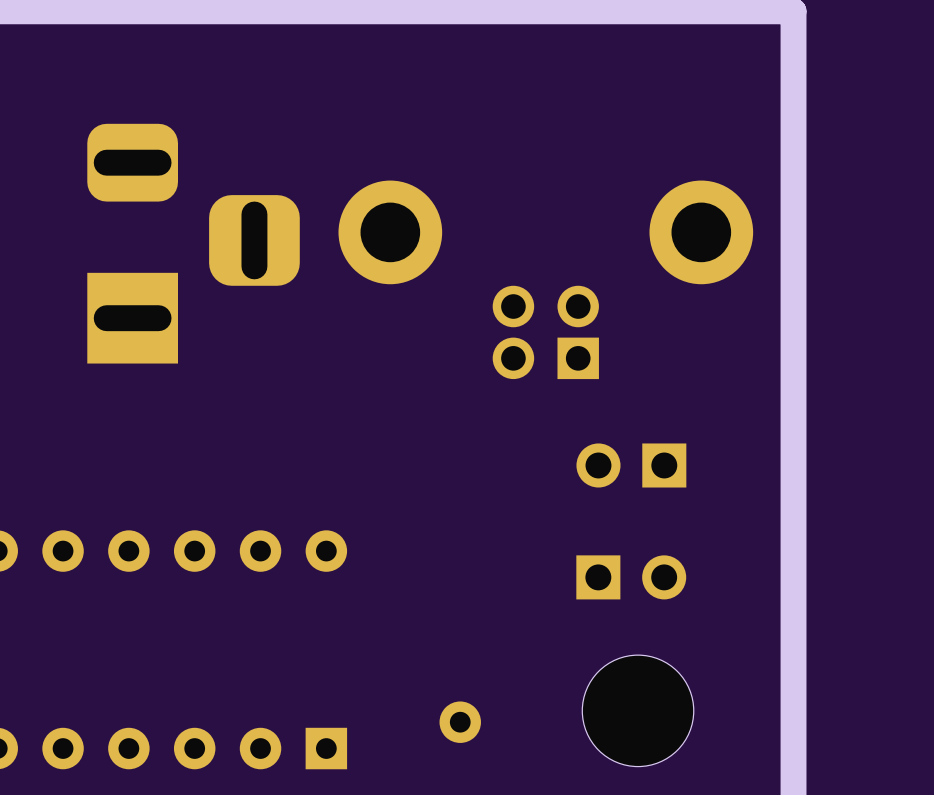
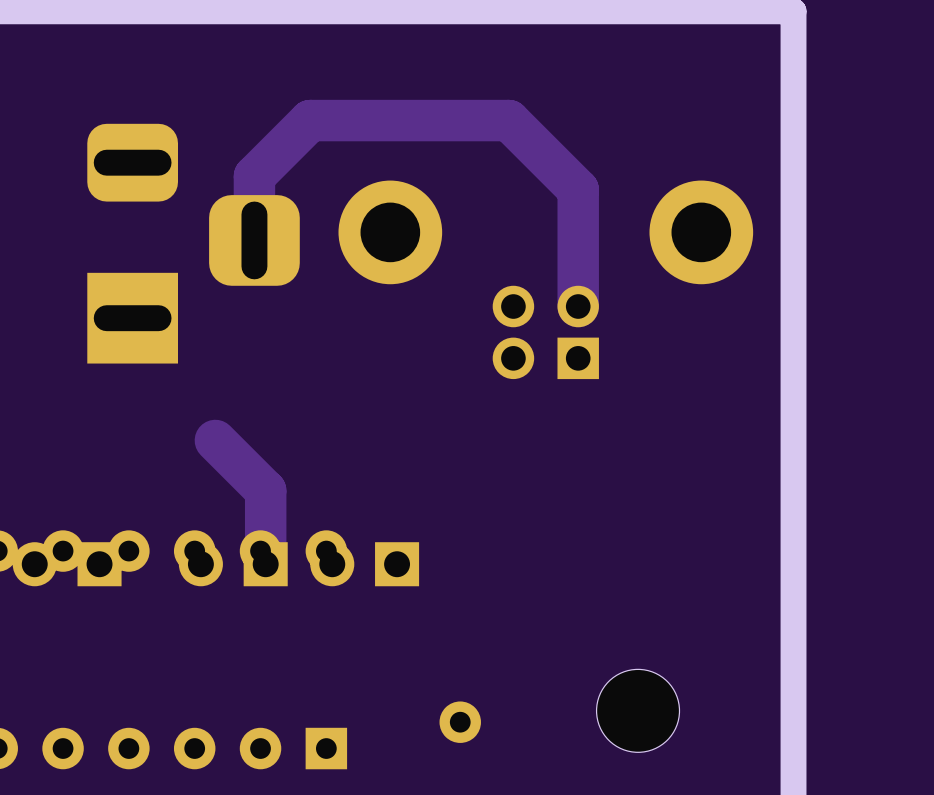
track: none -> (254, 240) (254, 176) (310, 120) (508, 120) (578, 189) (578, 306)
track: none -> (215, 440) (265, 490) (265, 564)
part: (631, 465) -> none
part: none -> (67, 564)
part: none -> (233, 564)
part: none -> (364, 564)
part: (631, 577) -> none
part footprint: [582, 655, 694, 767] -> [596, 669, 680, 753]

